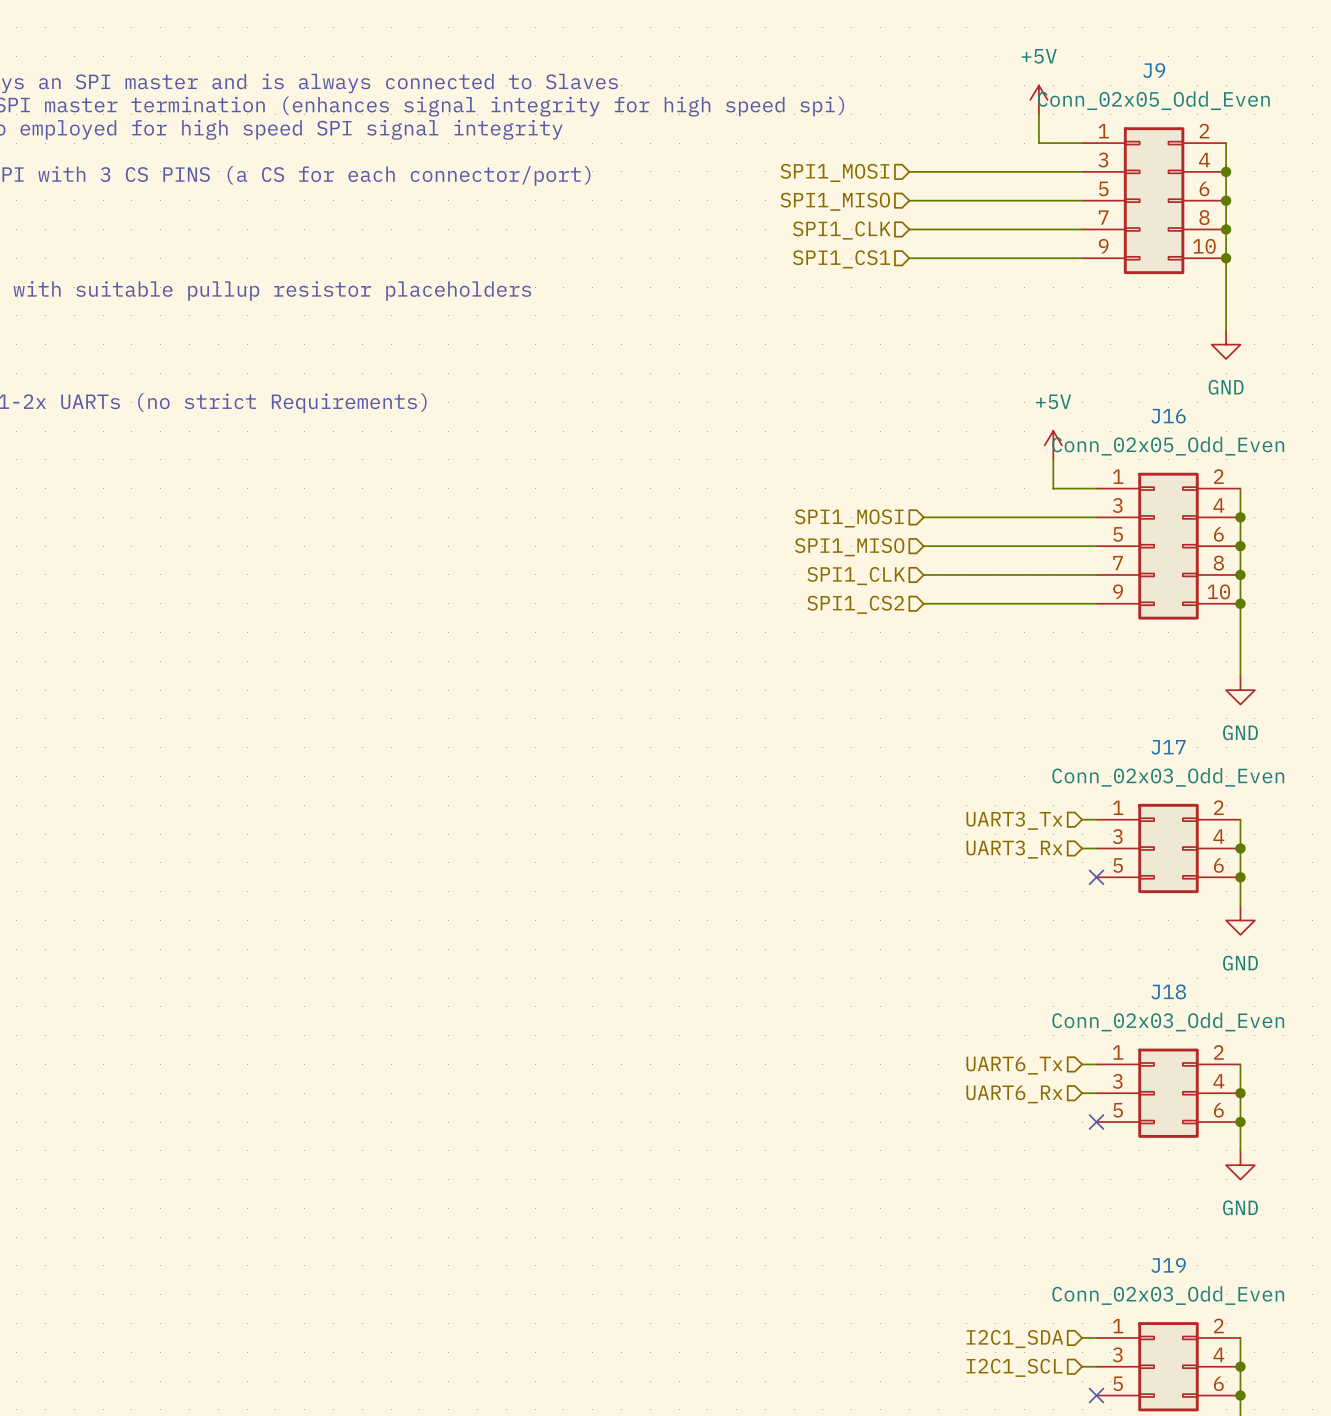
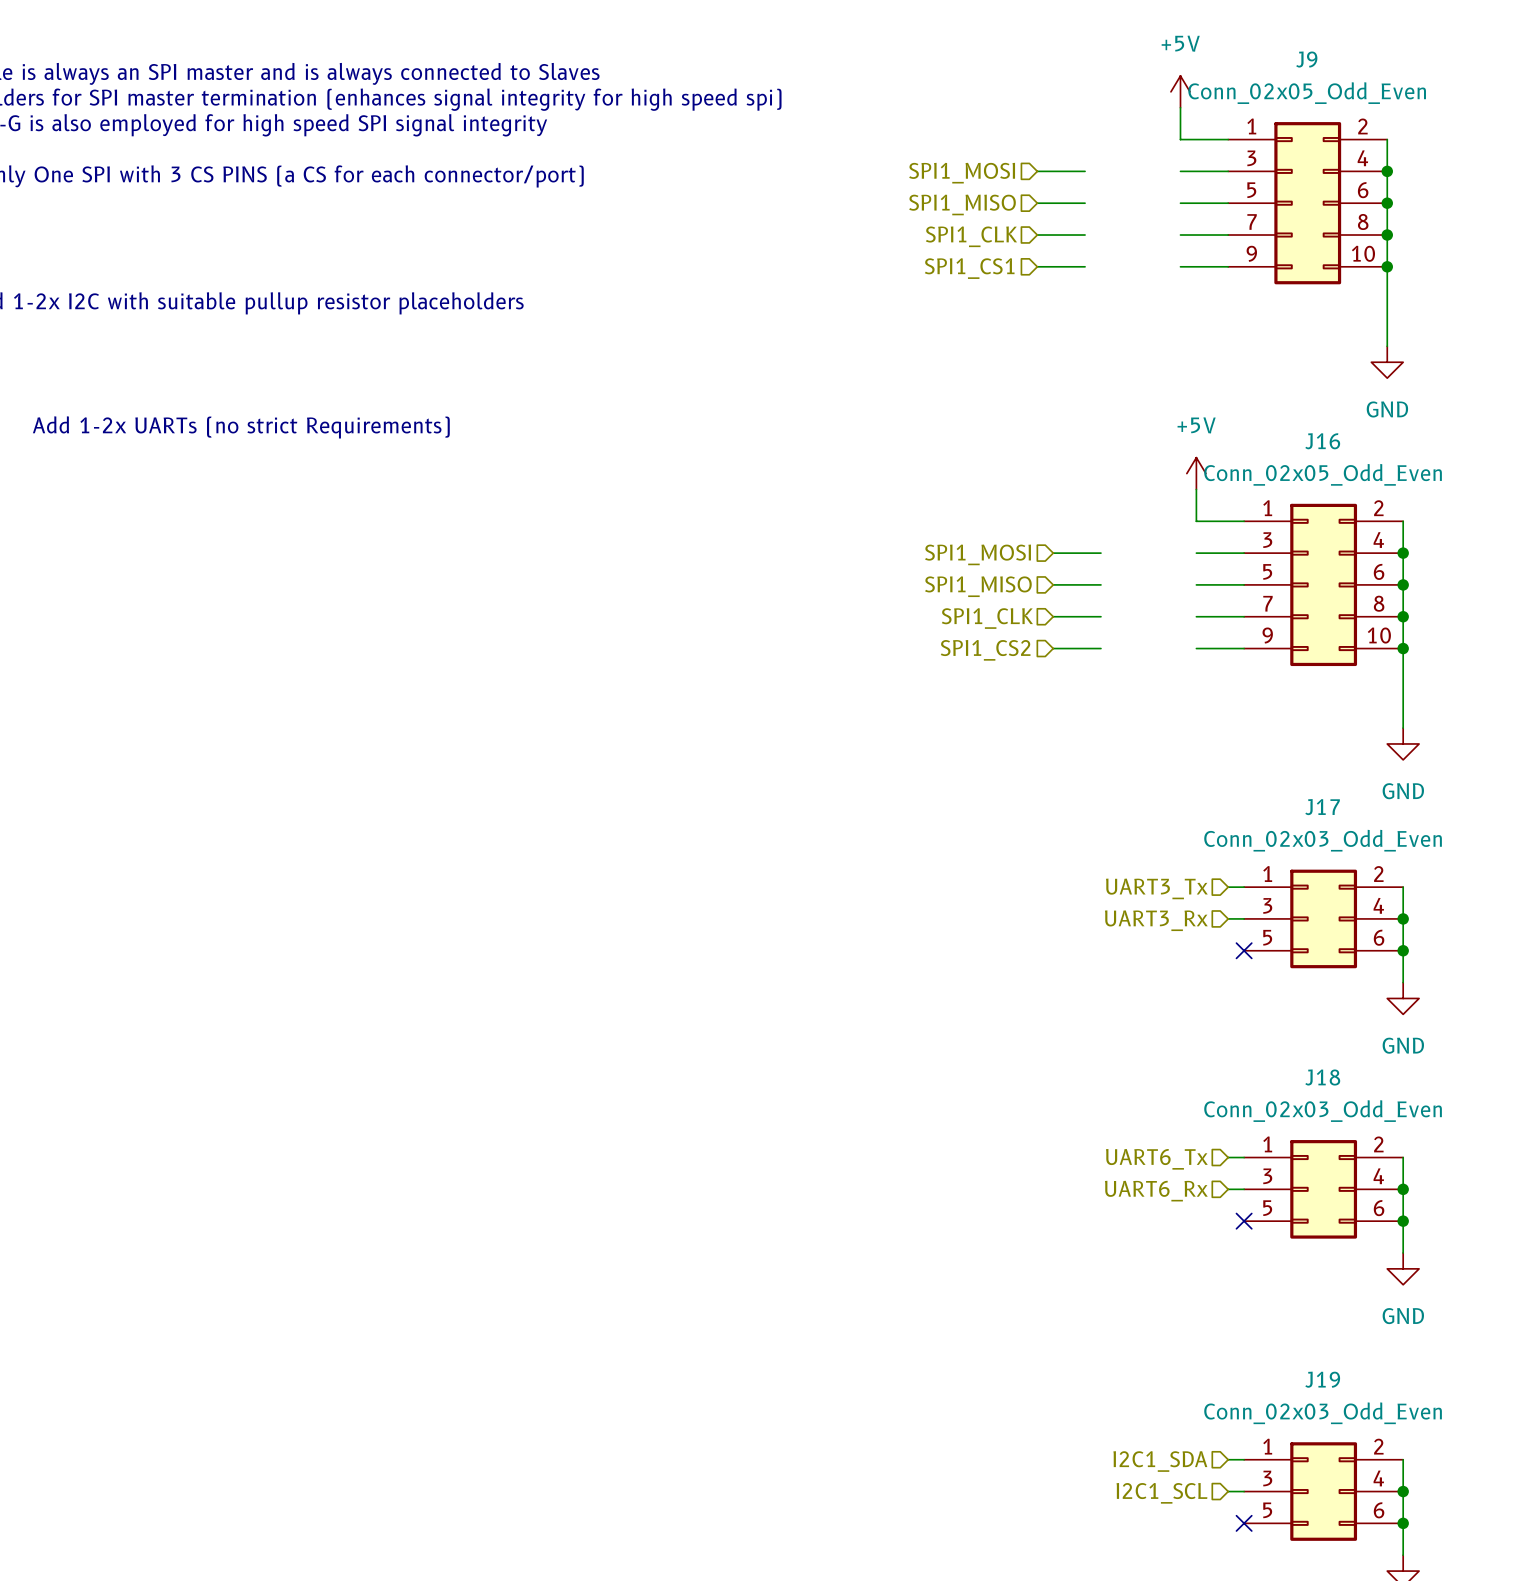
wire: (952, 171) (1038, 171) -> none
wire: (952, 200) (1038, 200) -> none
wire: (952, 229) (1038, 229) -> none
wire: (952, 258) (1038, 258) -> none
wire: (966, 517) (1053, 517) -> none
wire: (966, 546) (1053, 546) -> none
wire: (966, 574) (1053, 574) -> none
wire: (966, 603) (1053, 603) -> none

